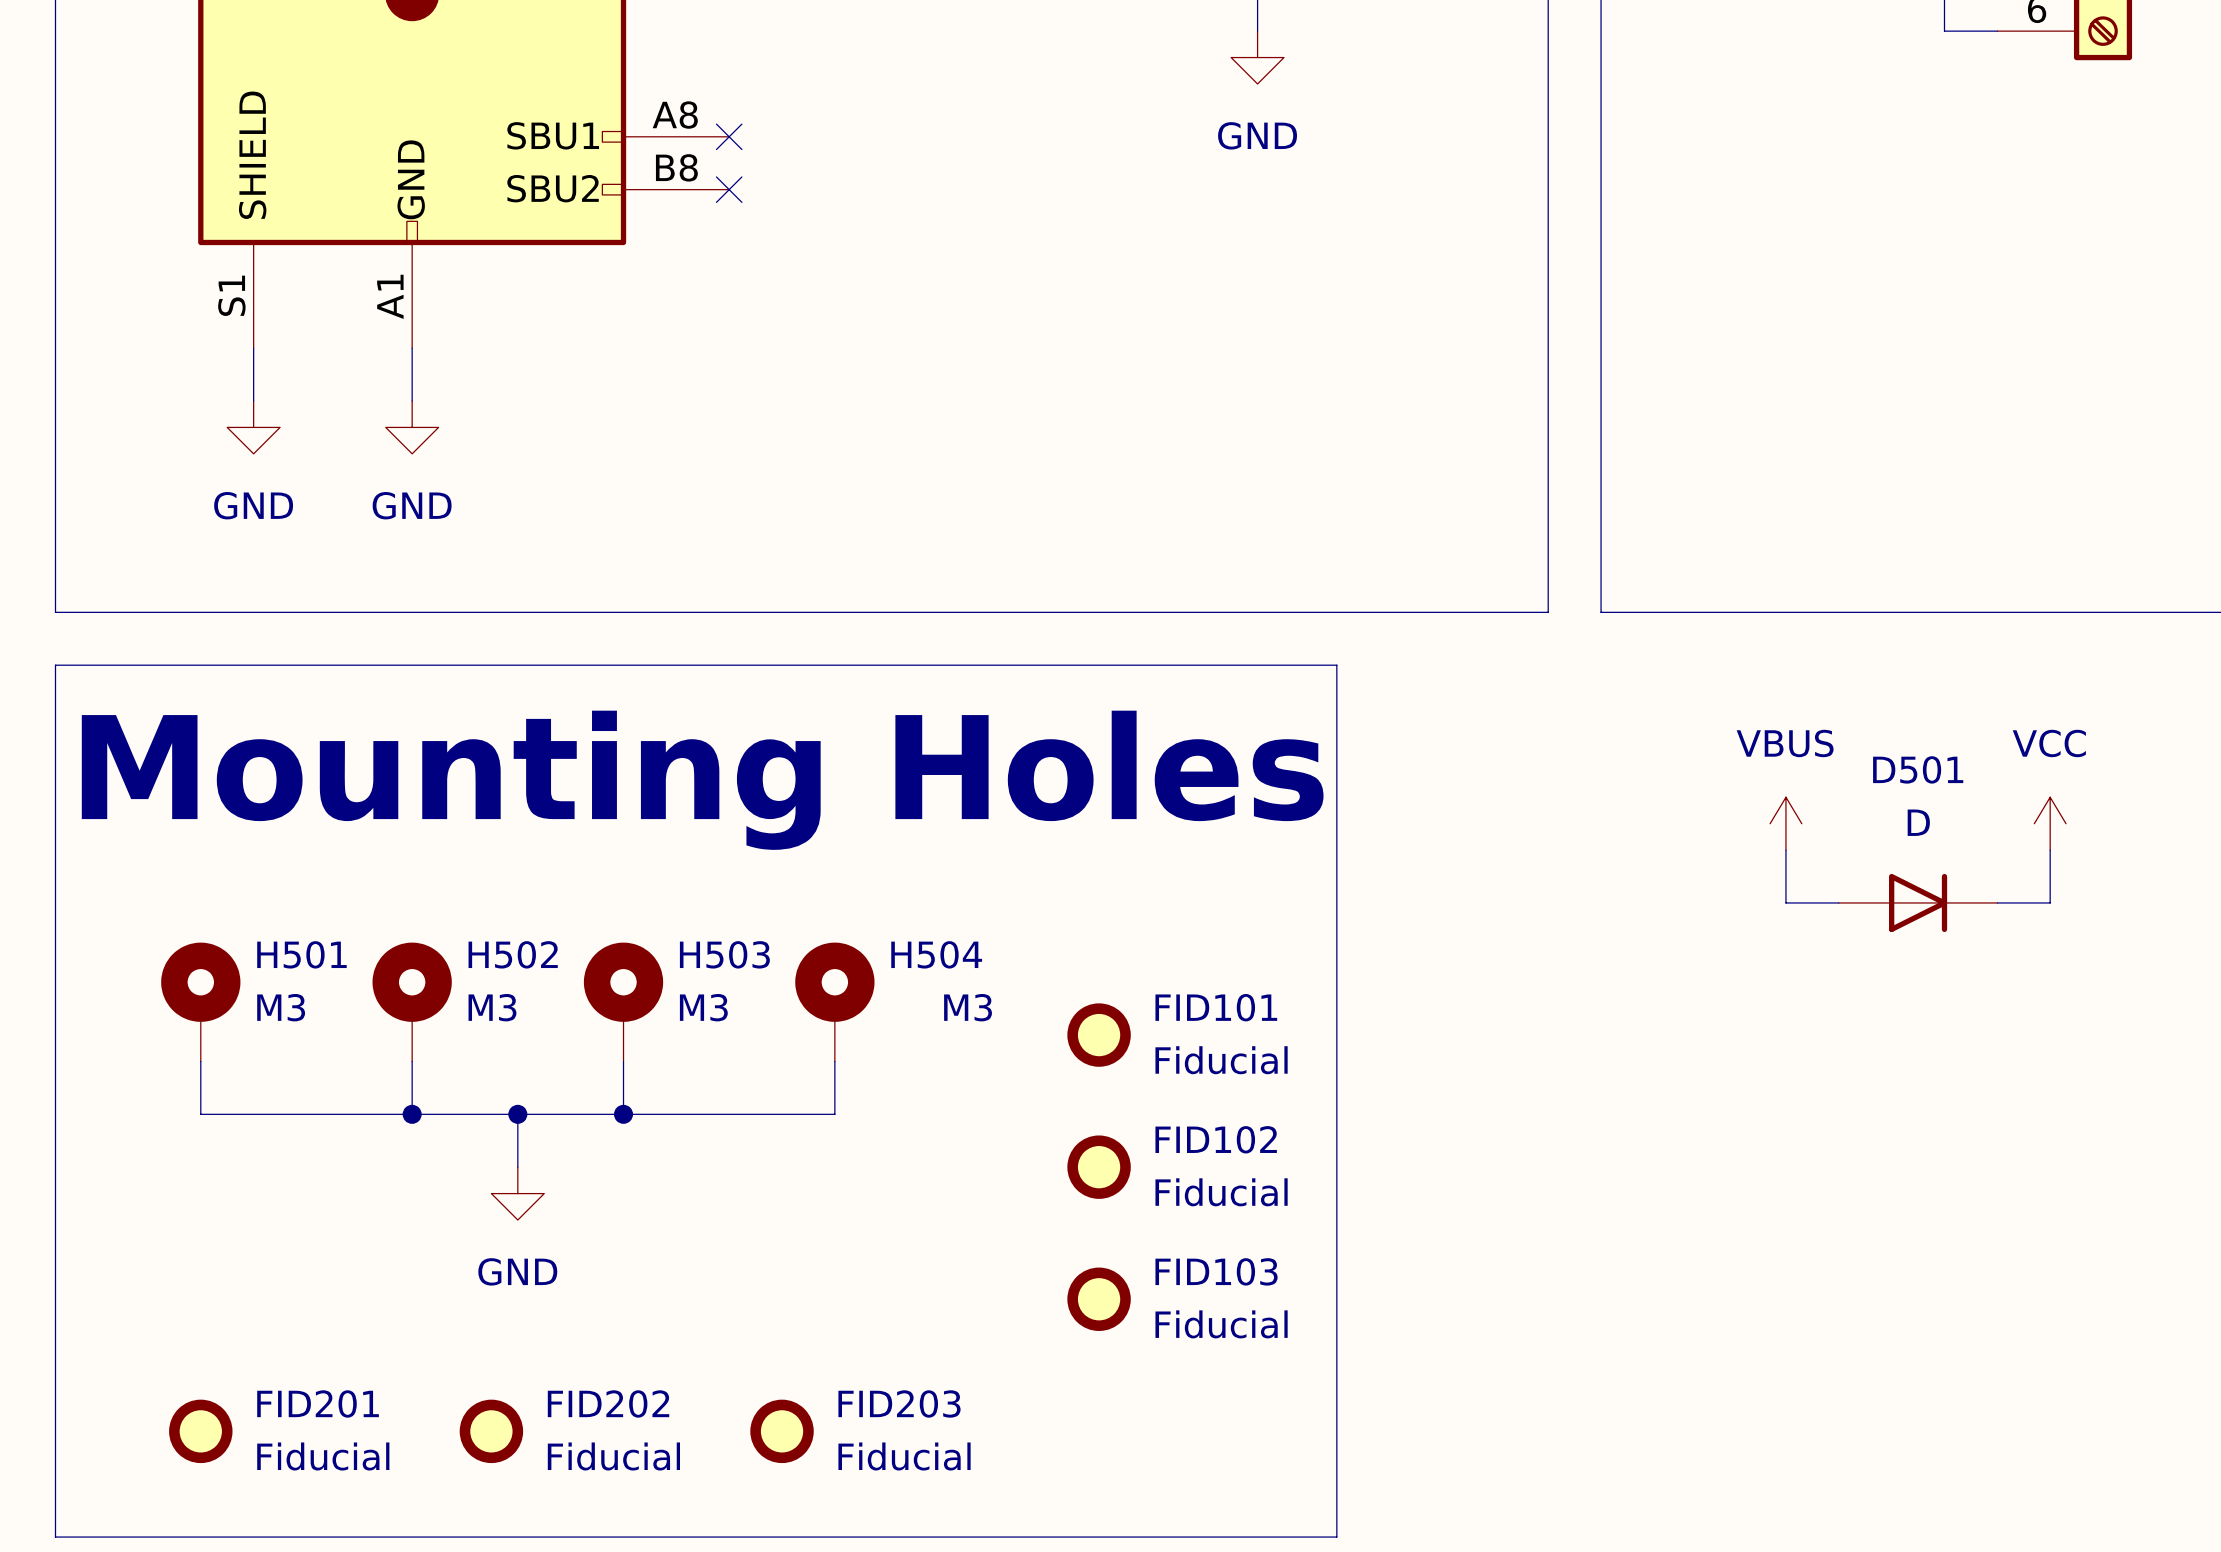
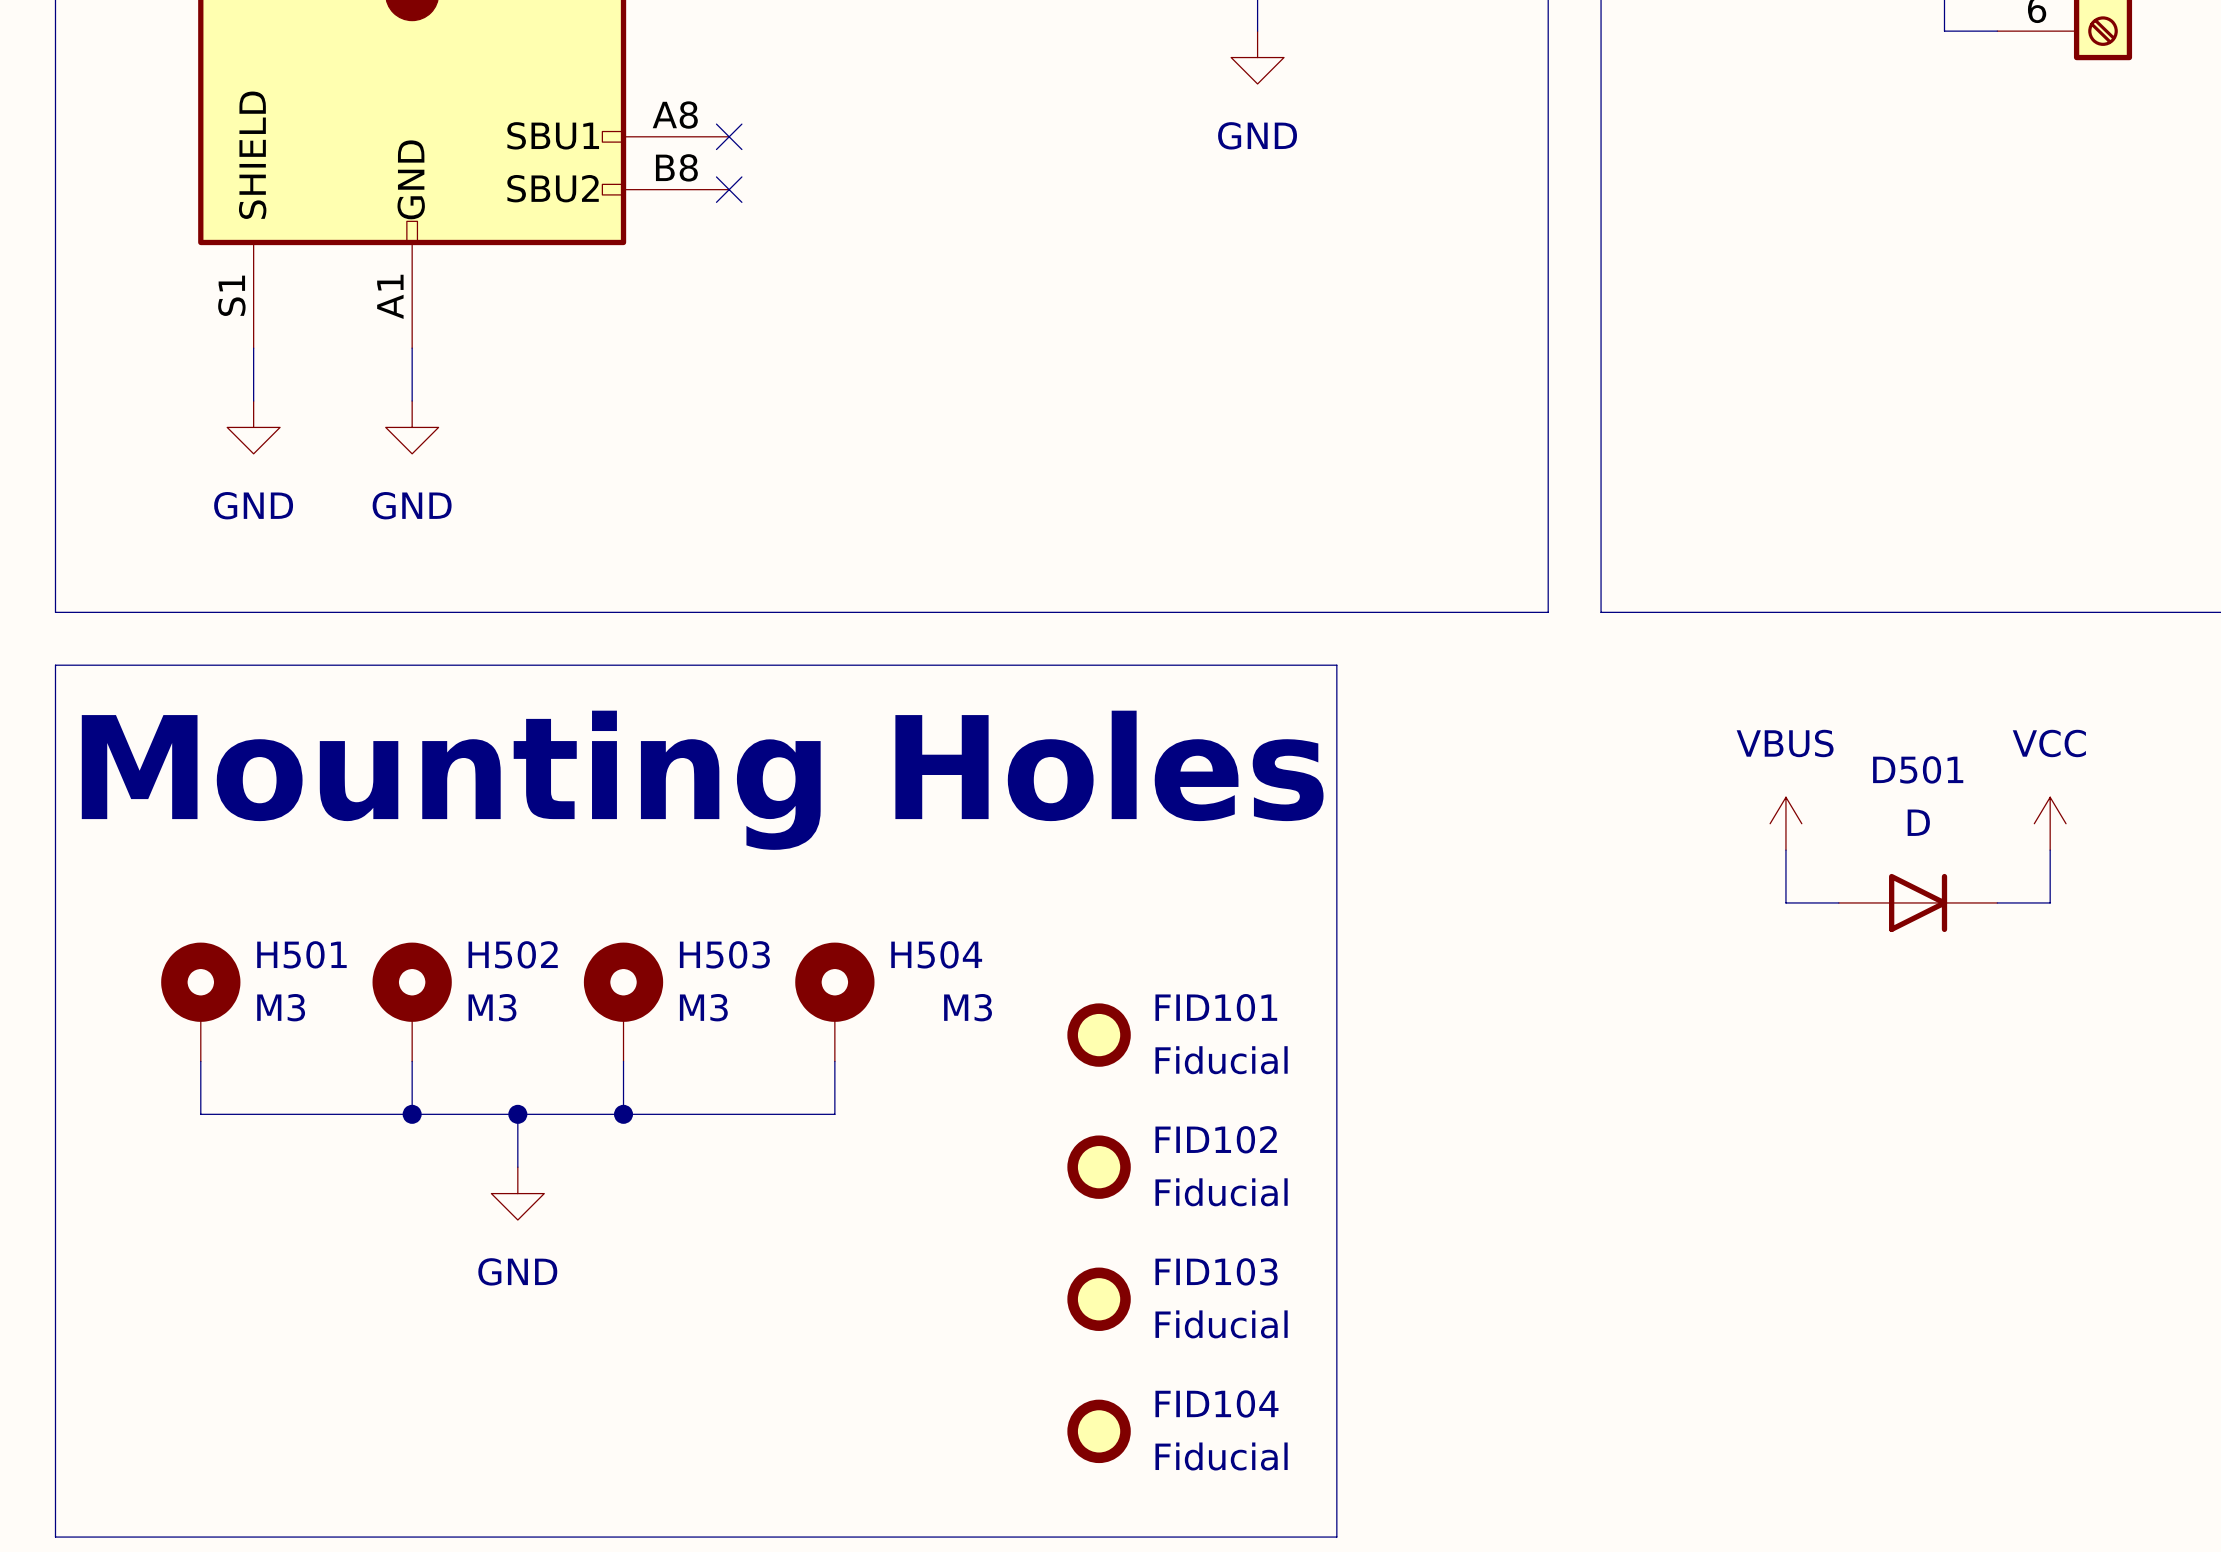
FID201: Fiducial (200, 1431) -> none
FID202: Fiducial (491, 1431) -> none
FID203: Fiducial (782, 1431) -> none
FID104: none -> Fiducial (1099, 1431)

